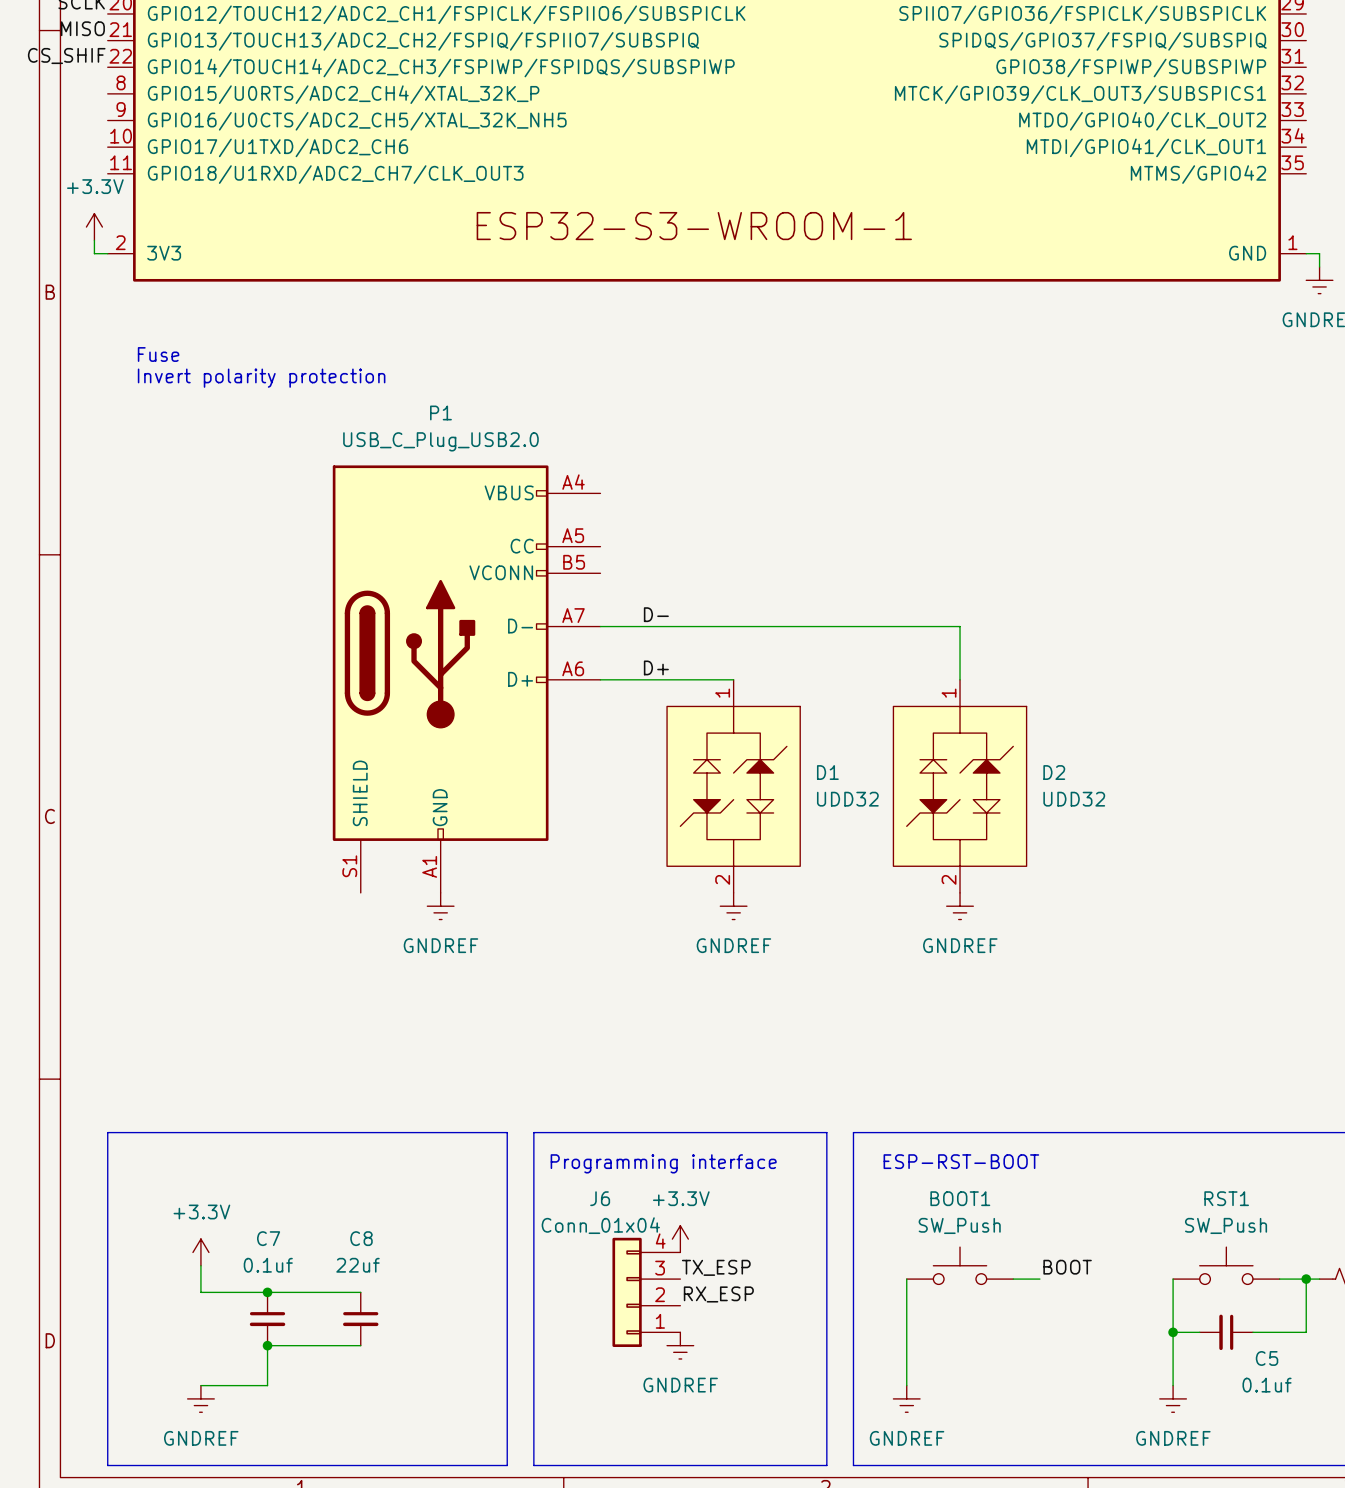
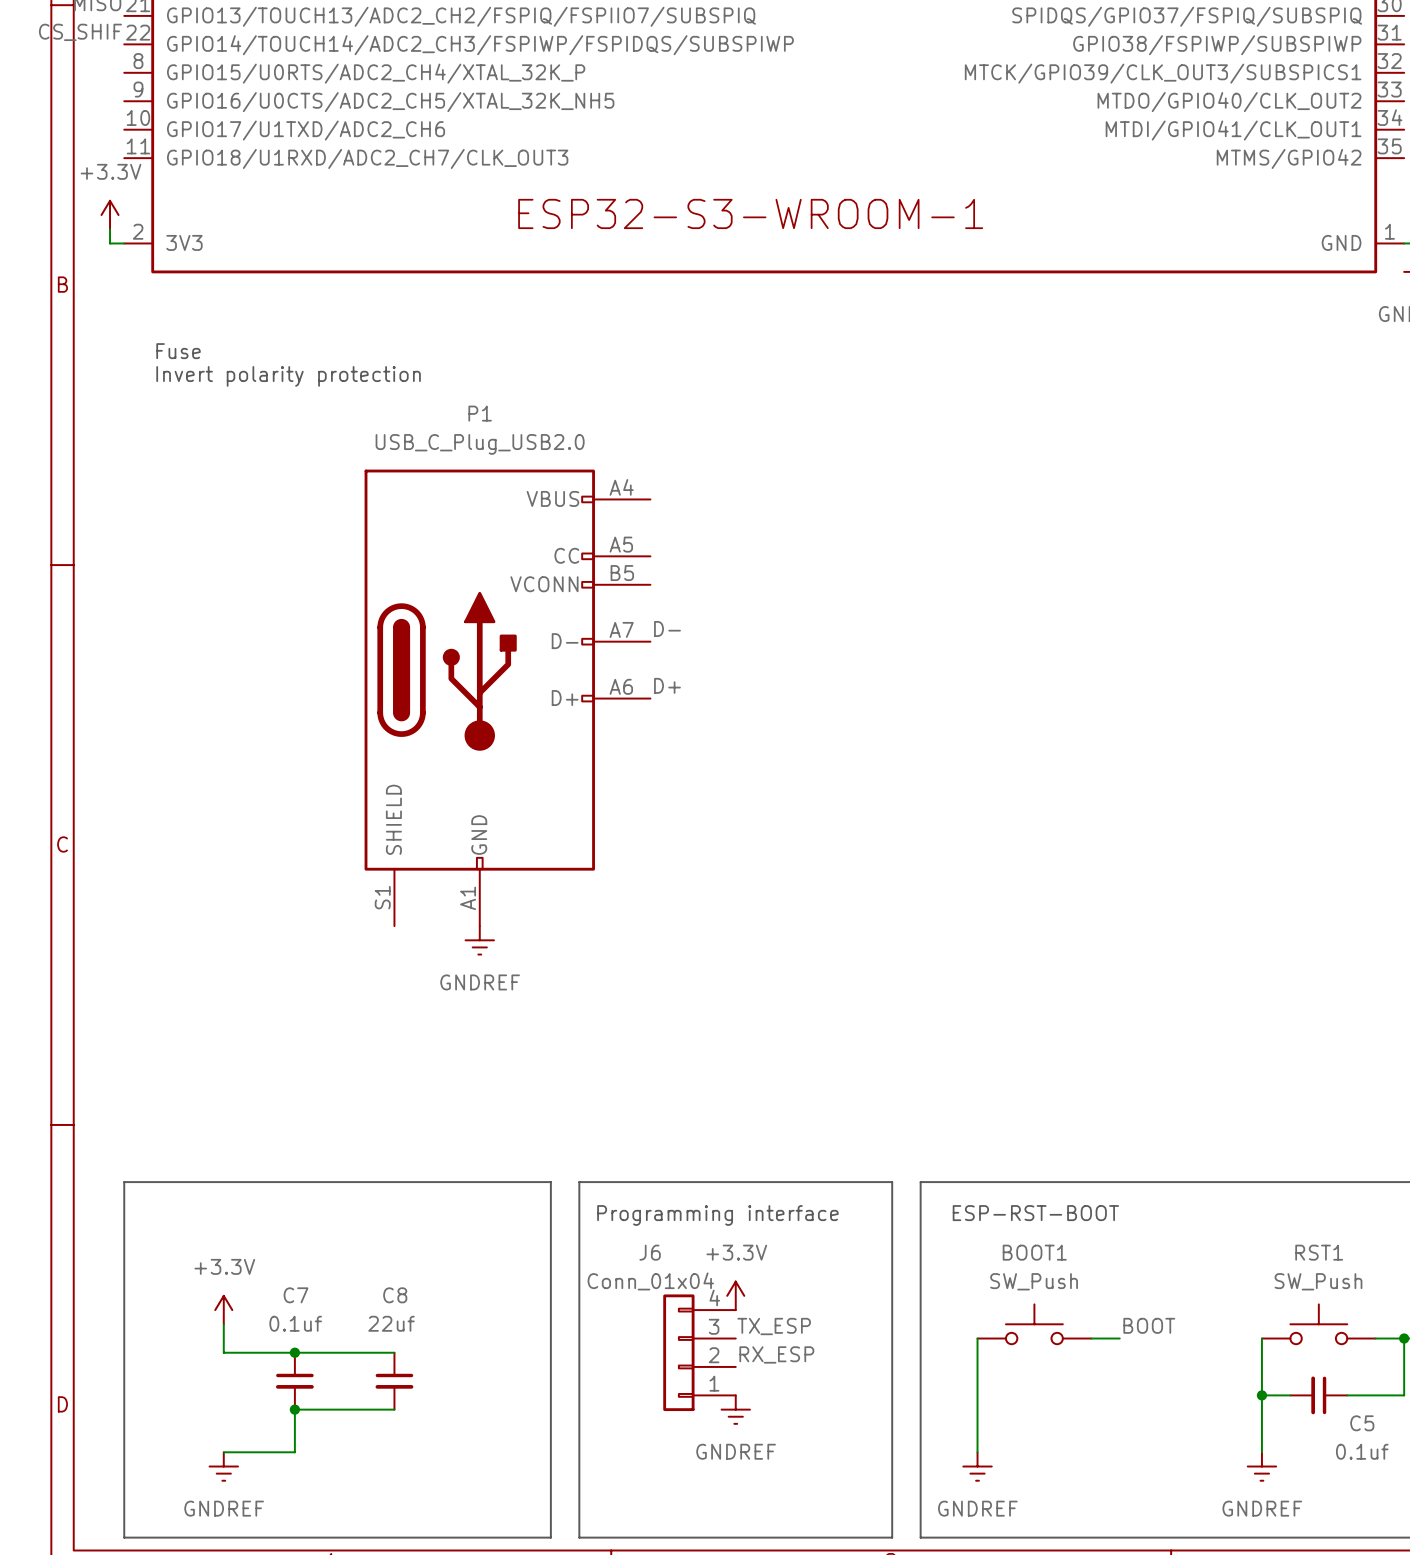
label position: D- (656, 614) -> D- (667, 628)
wire: (600, 626) (960, 626) (960, 679) -> none
label position: D+ (656, 667) -> D+ (667, 685)
wire: (600, 679) (733, 679) -> none
D1: UDD32 (733, 786) -> none
D2: UDD32 (960, 786) -> none
power symbol: GNDREF (733, 906) -> none
power symbol: GNDREF (960, 906) -> none

